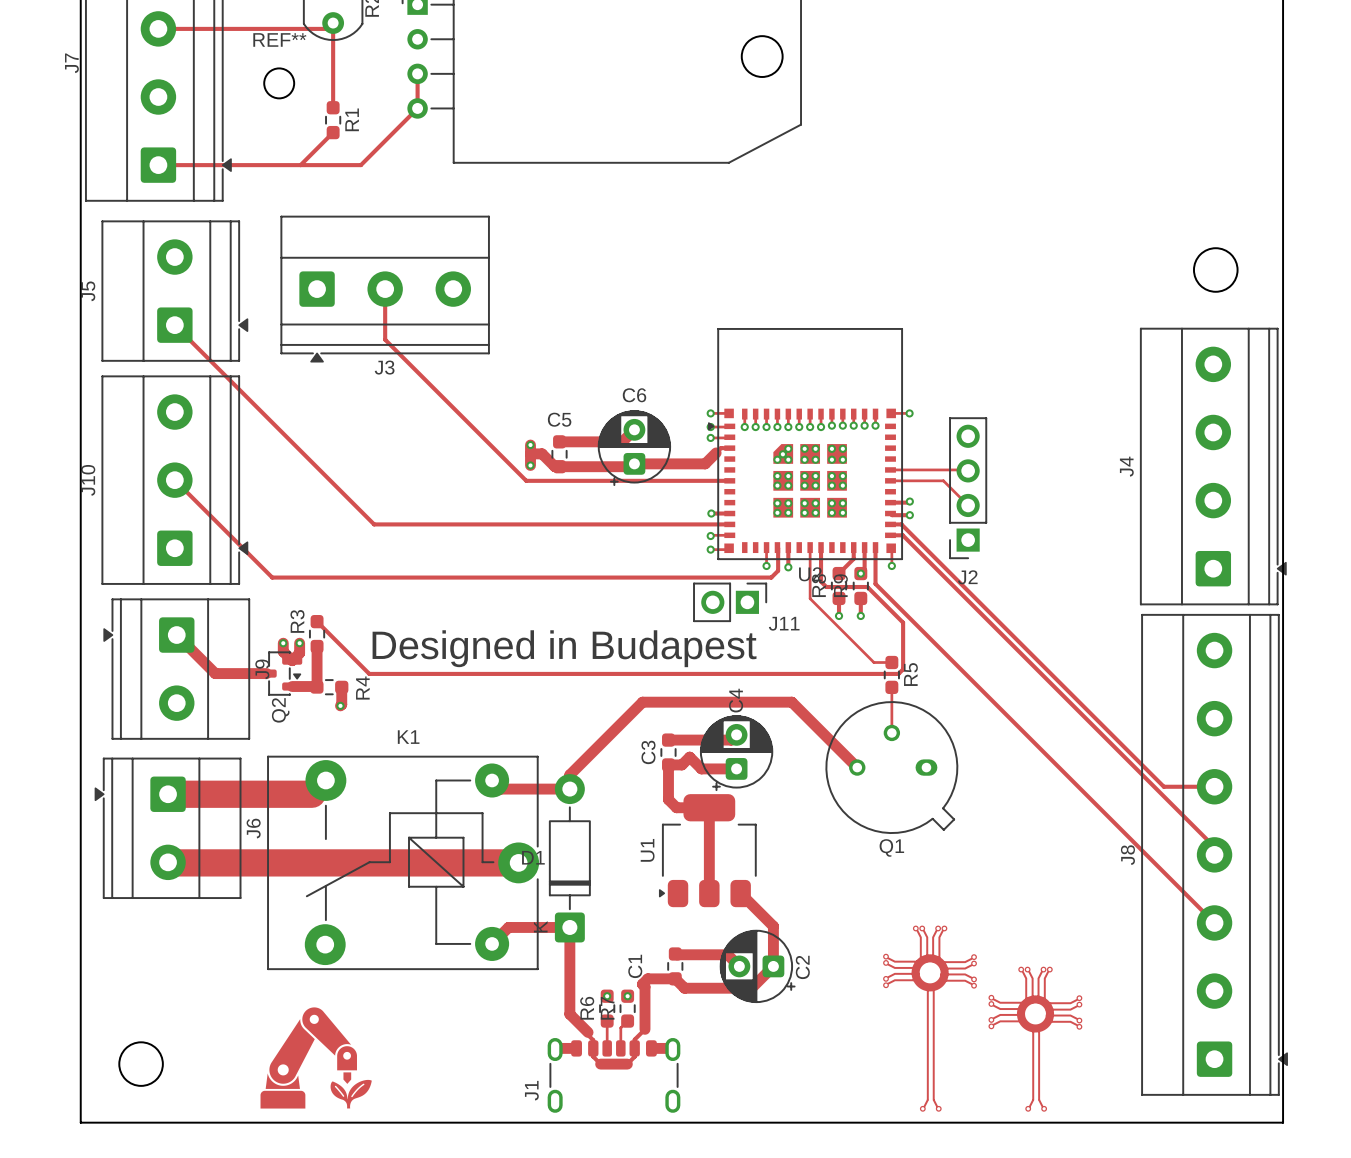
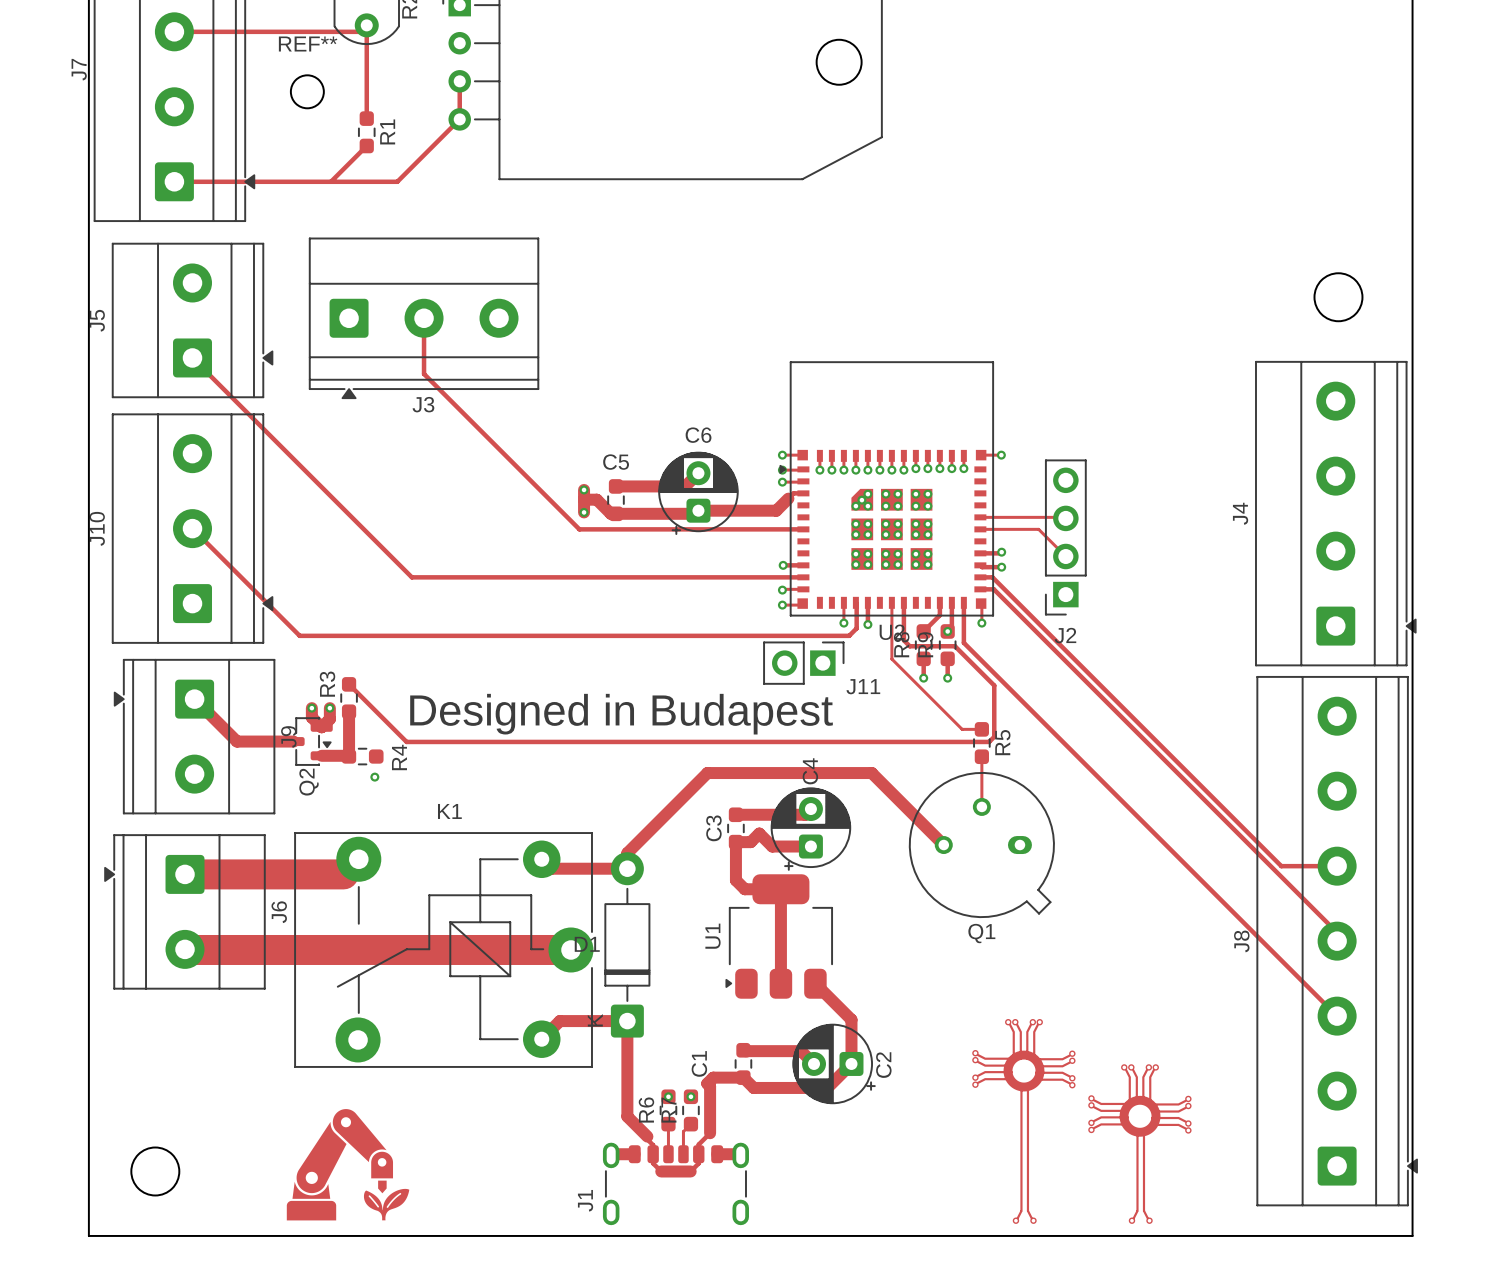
track: (341, 687) (340, 705) -> none

